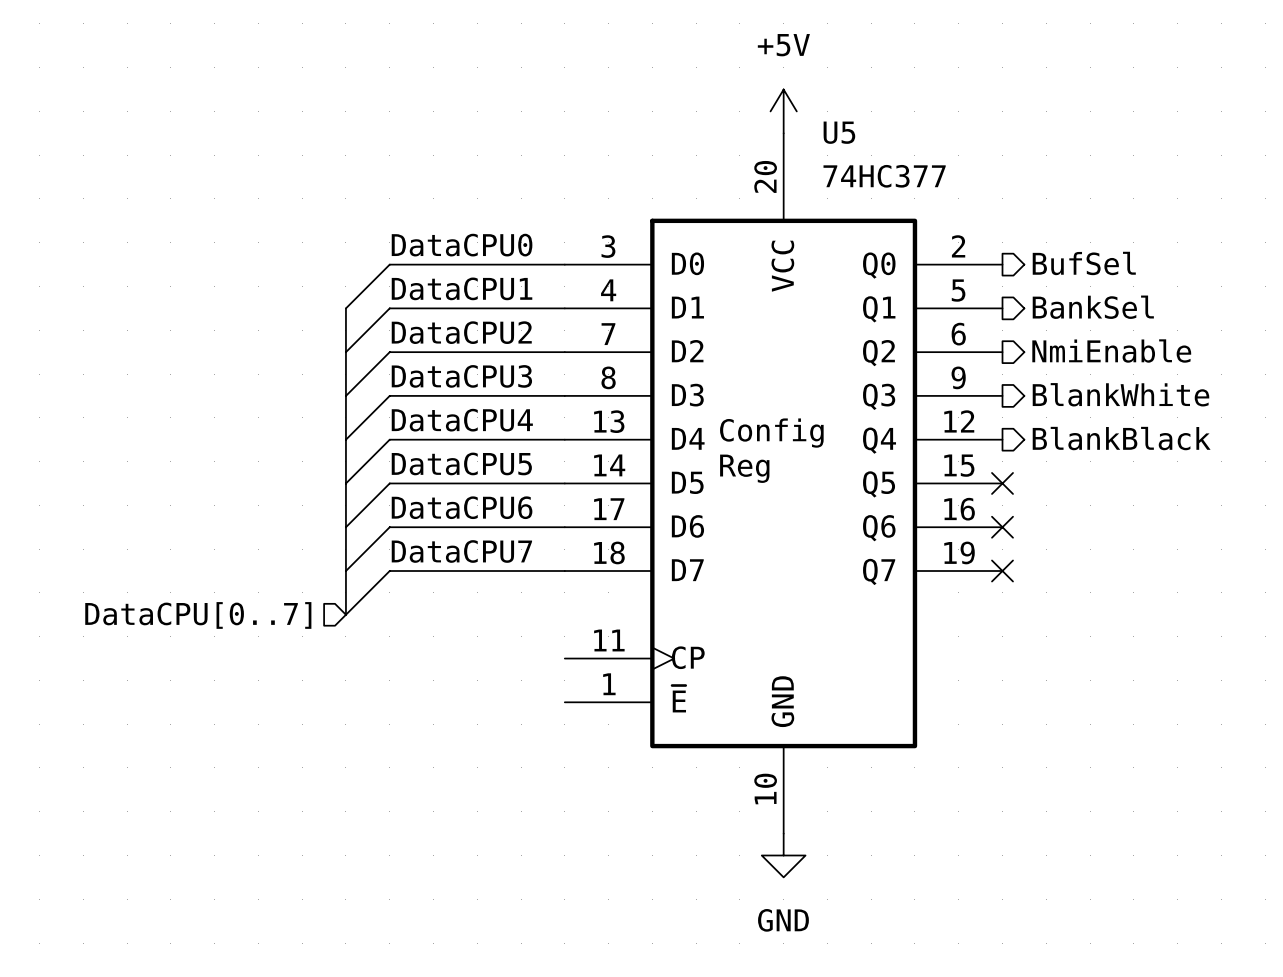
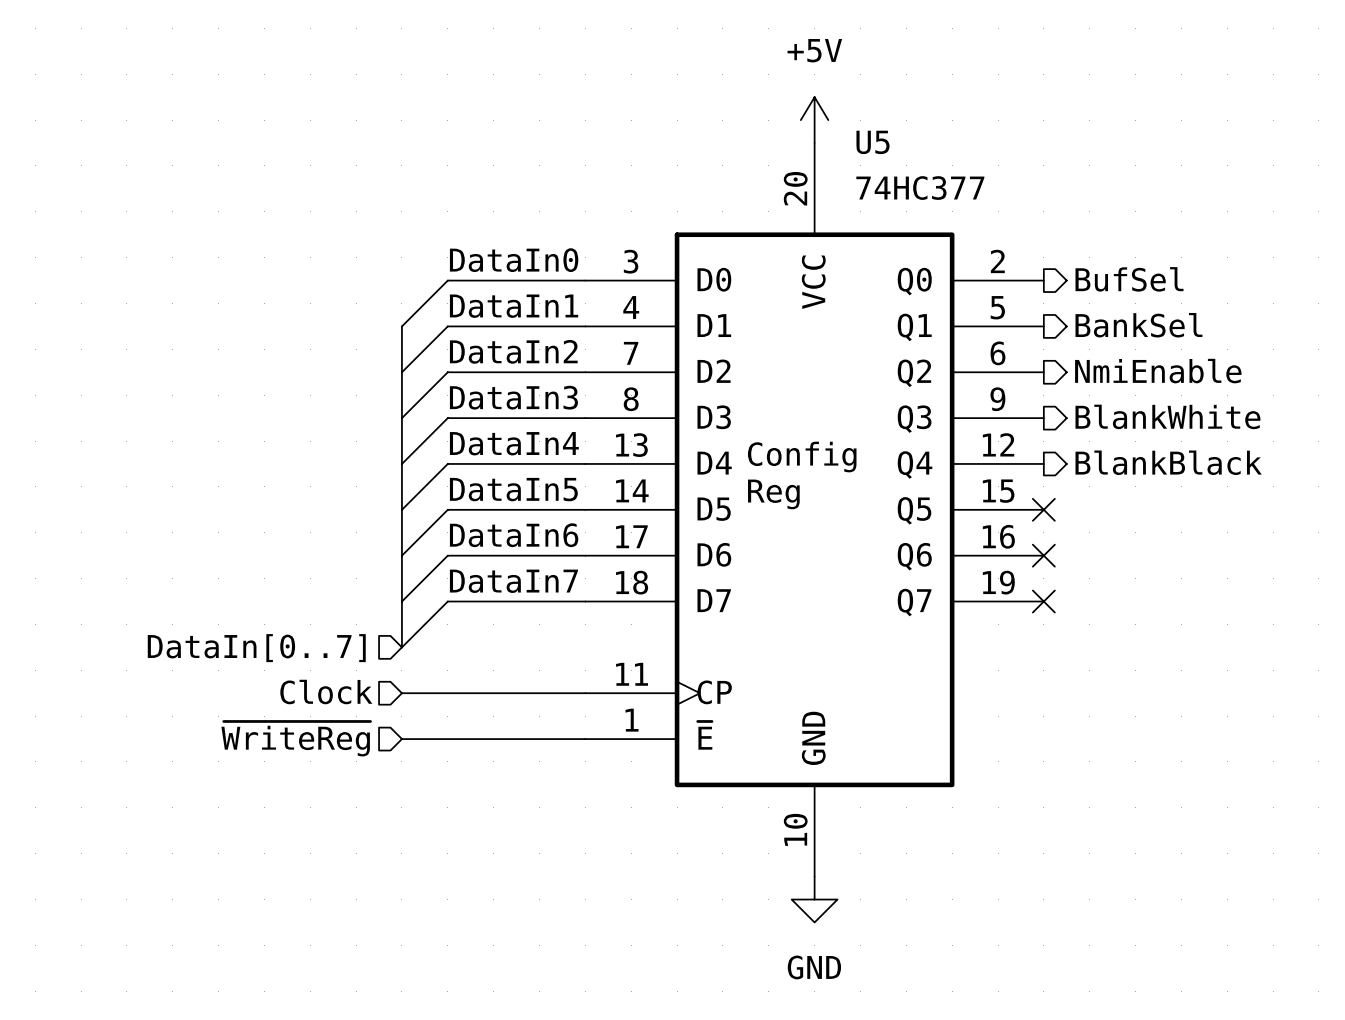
label: DataCPU0 (462, 245) -> DataIn0 (514, 260)
wire: (433, 264) (389, 264) (345, 308) -> (447, 280) (401, 326)
label: DataCPU1 (462, 288) -> DataIn1 (514, 306)
bus: (345, 308) (345, 614) -> (401, 326) (401, 647)
wire: (433, 308) (389, 308) (345, 352) -> (447, 326) (401, 372)
label: DataCPU2 (461, 332) -> DataIn2 (513, 351)
wire: (433, 352) (389, 352) (345, 395) -> (447, 372) (401, 418)
label: DataCPU3 (461, 376) -> DataIn3 (513, 397)
wire: (433, 395) (389, 395) (345, 439) -> (447, 418) (401, 463)
label: DataCPU4 (462, 420) -> DataIn4 (514, 443)
wire: (433, 439) (389, 439) (345, 483) -> (447, 463) (401, 509)
label: DataCPU5 (461, 463) -> DataIn5 (513, 489)
wire: (433, 483) (389, 483) (345, 527) -> (447, 509) (401, 555)
label: DataCPU6 (462, 507) -> DataIn6 (514, 535)
wire: (433, 527) (389, 527) (345, 571) -> (447, 555) (401, 601)
label: DataCPU7 (461, 551) -> DataIn7 (513, 581)
wire: (433, 571) (389, 571) (345, 614) -> (447, 601) (401, 647)
hierarchical label: DataCPU[0..7] (198, 615) -> DataIn[0..7] (256, 648)
hierarchical label: none -> Clock (326, 692)
wire: none -> (401, 693) (585, 693)
hierarchical label: none -> ~{WriteReg} (295, 738)
wire: none -> (401, 739) (585, 739)

